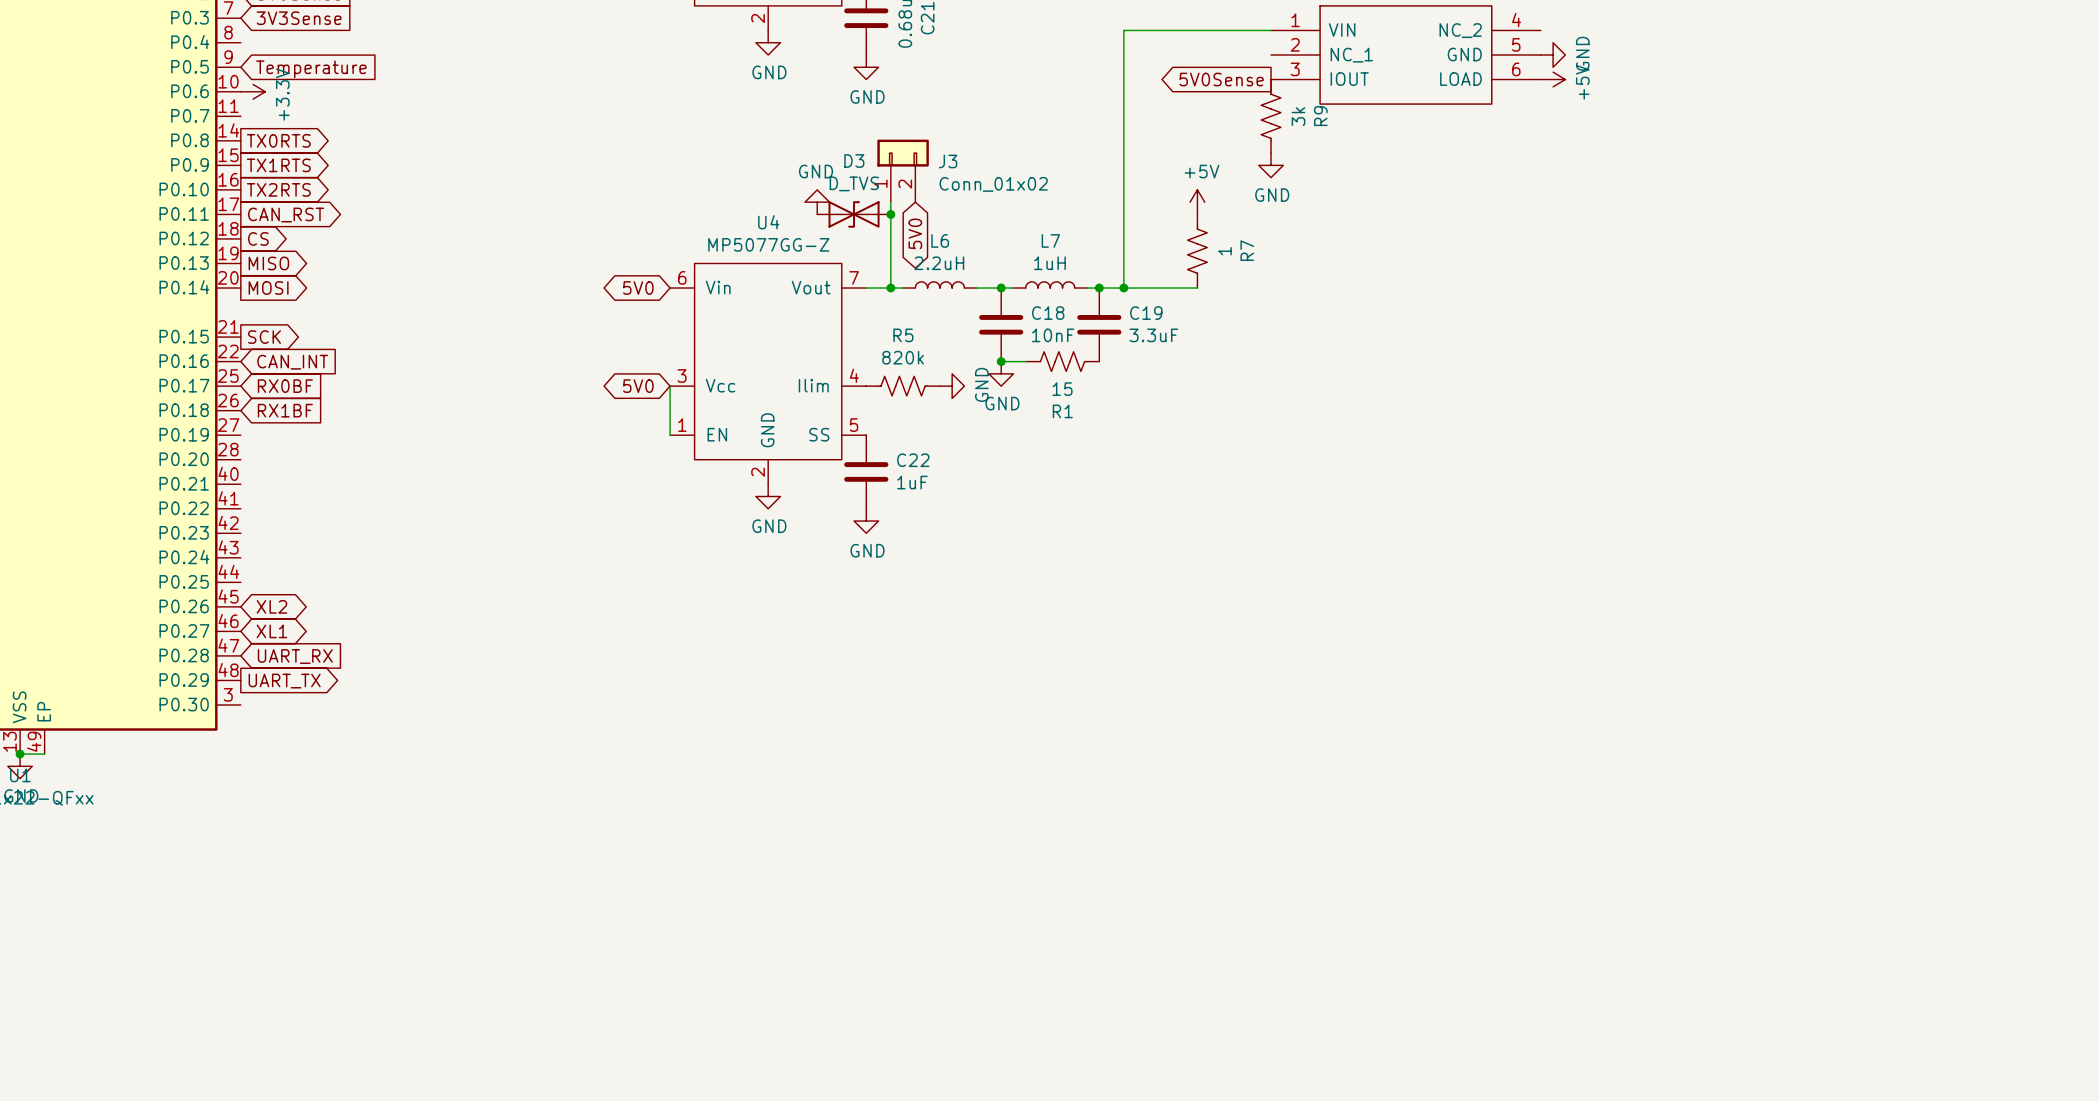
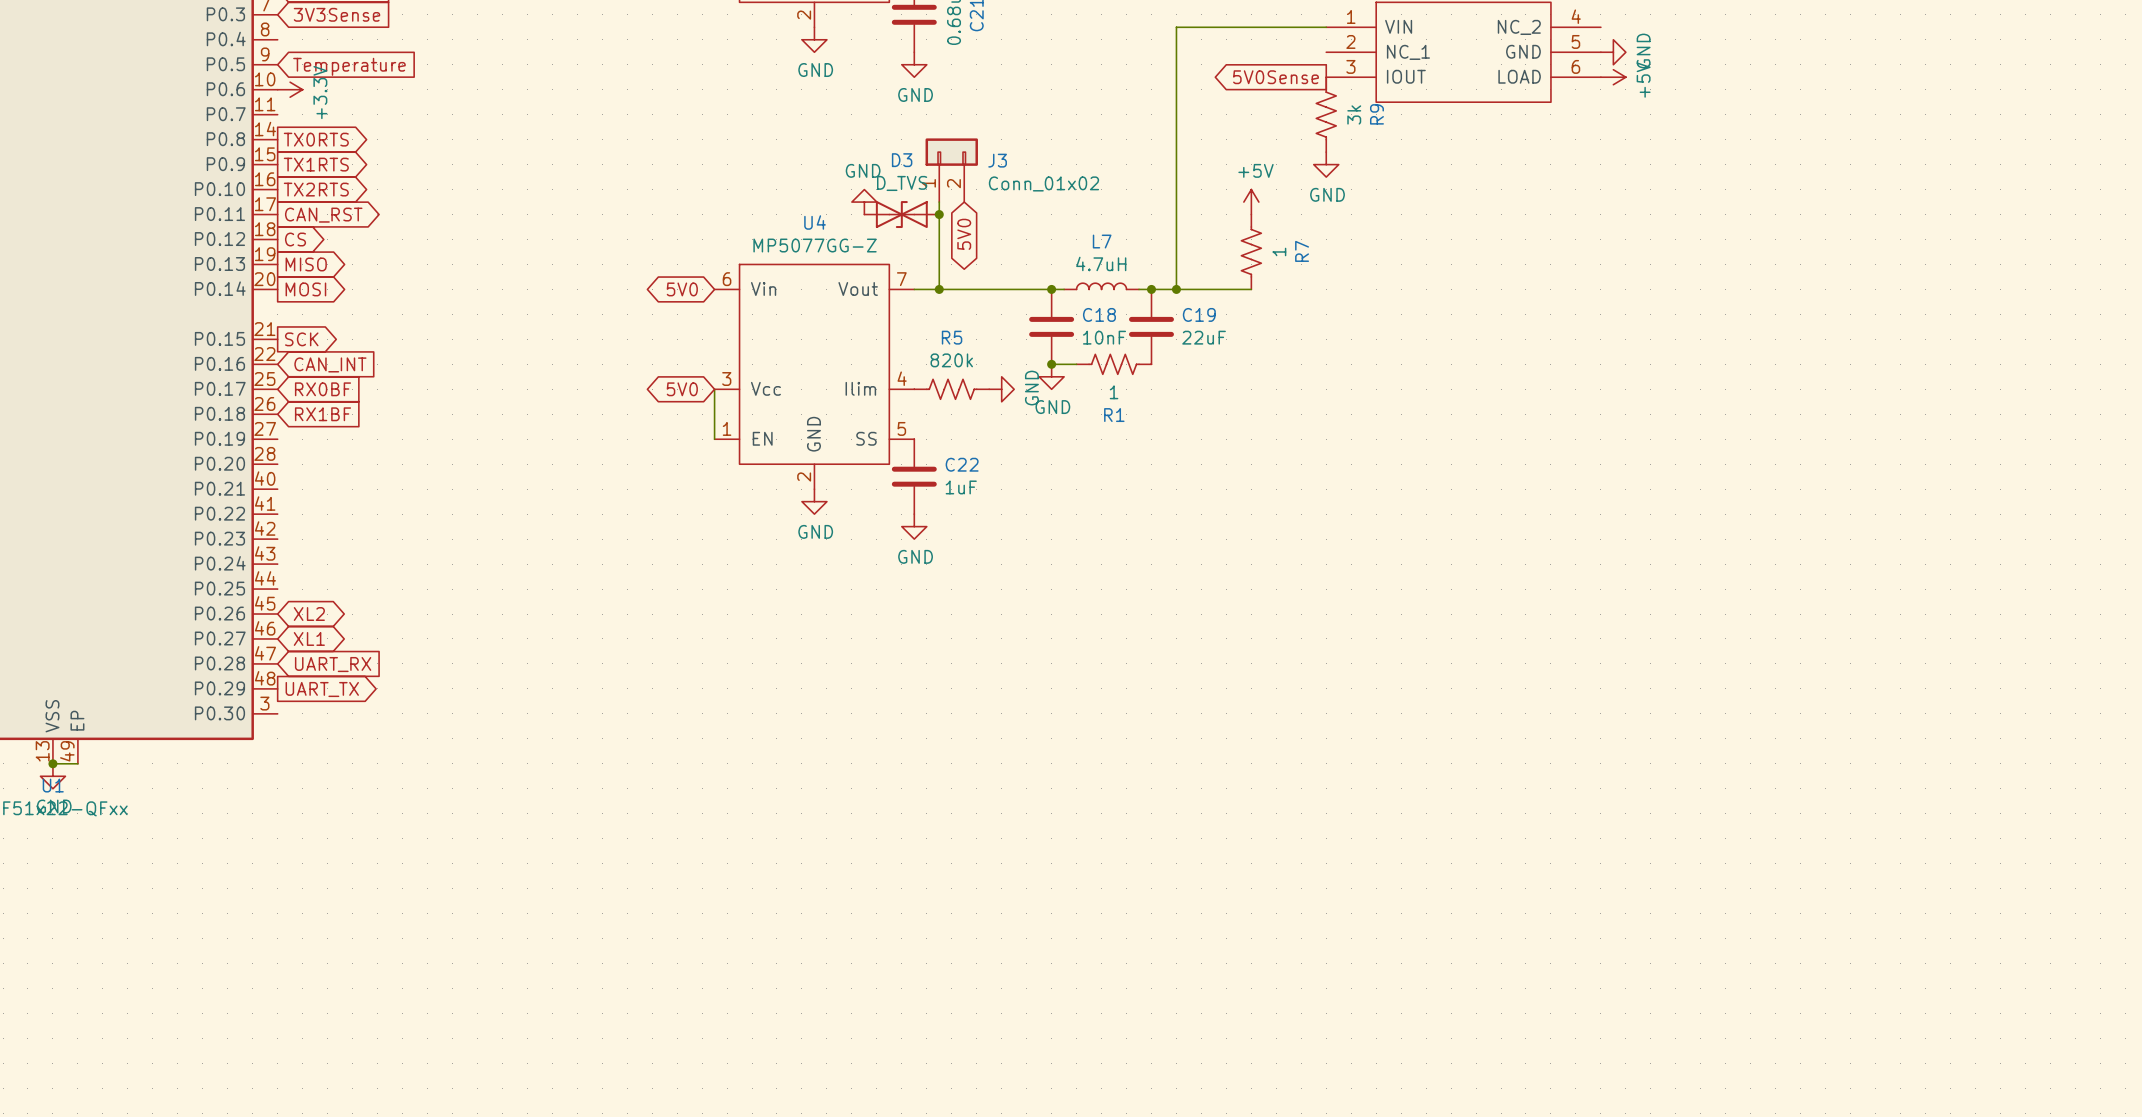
L7 value: 1uH (1049, 263) -> 4.7uH (1101, 263)
L6: 2.2uH (939, 284) -> none
wire: none -> (951, 289) (1026, 289)
C19 value: 3.3uF (1153, 335) -> 22uF (1204, 337)
R1 value: 15 (1062, 389) -> 1 (1114, 392)

